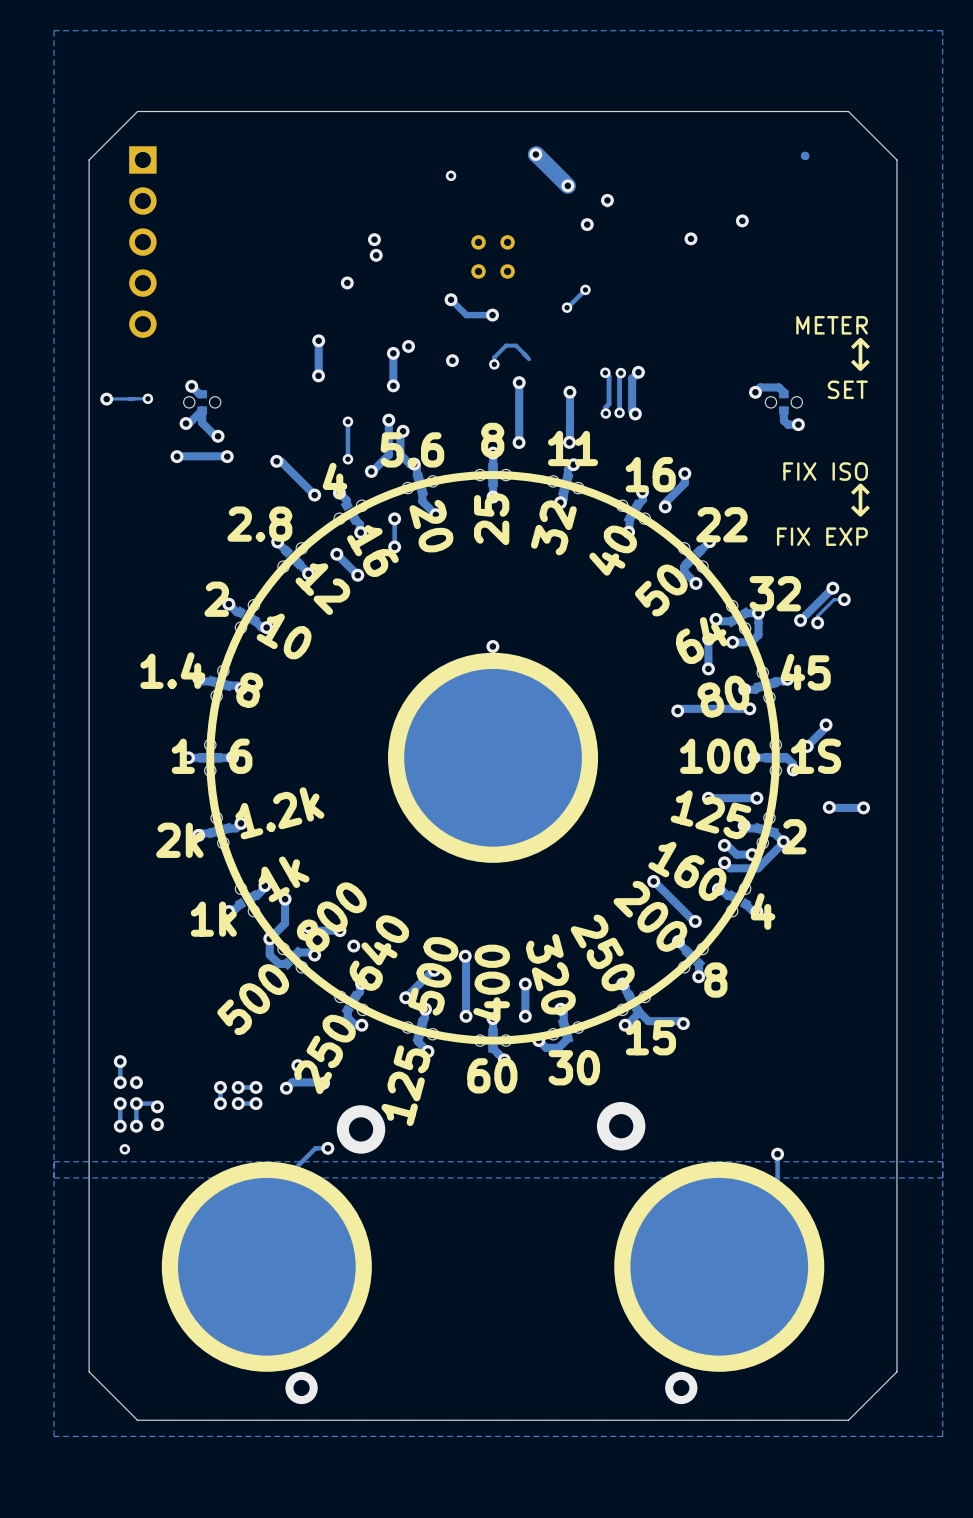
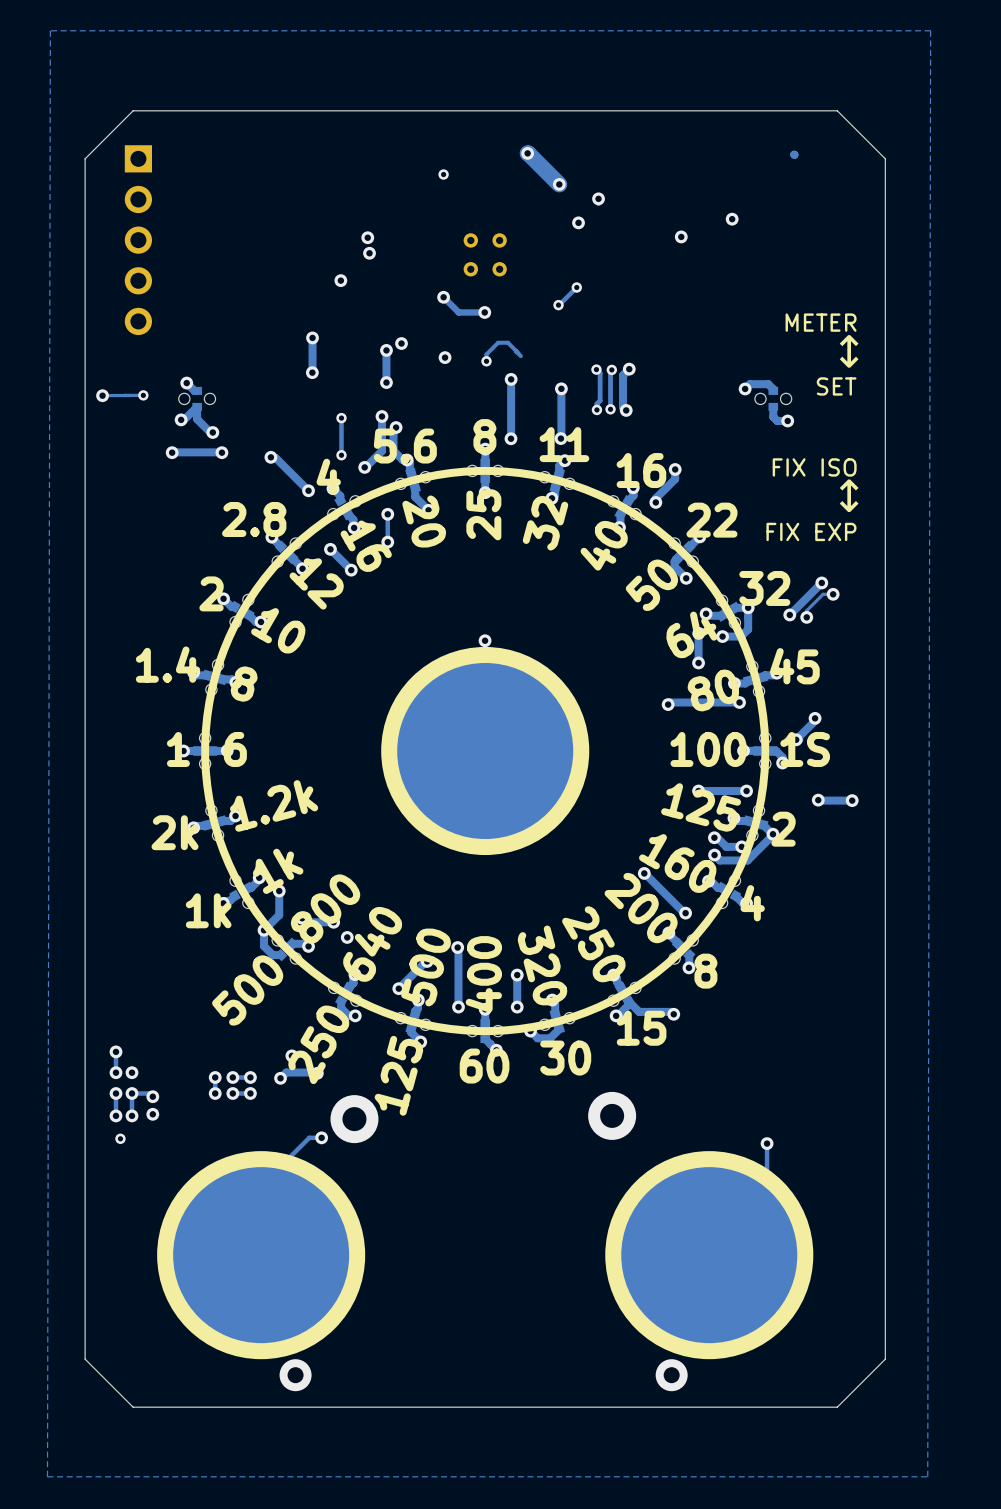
zone outline: (942, 30) (942, 1436) (54, 1436) (54, 30) -> (930, 30) (927, 1476) (47, 1476) (50, 30)
zone outline: (942, 1161) (54, 1161) -> none
zone outline: (942, 1177) (54, 1177) -> none

